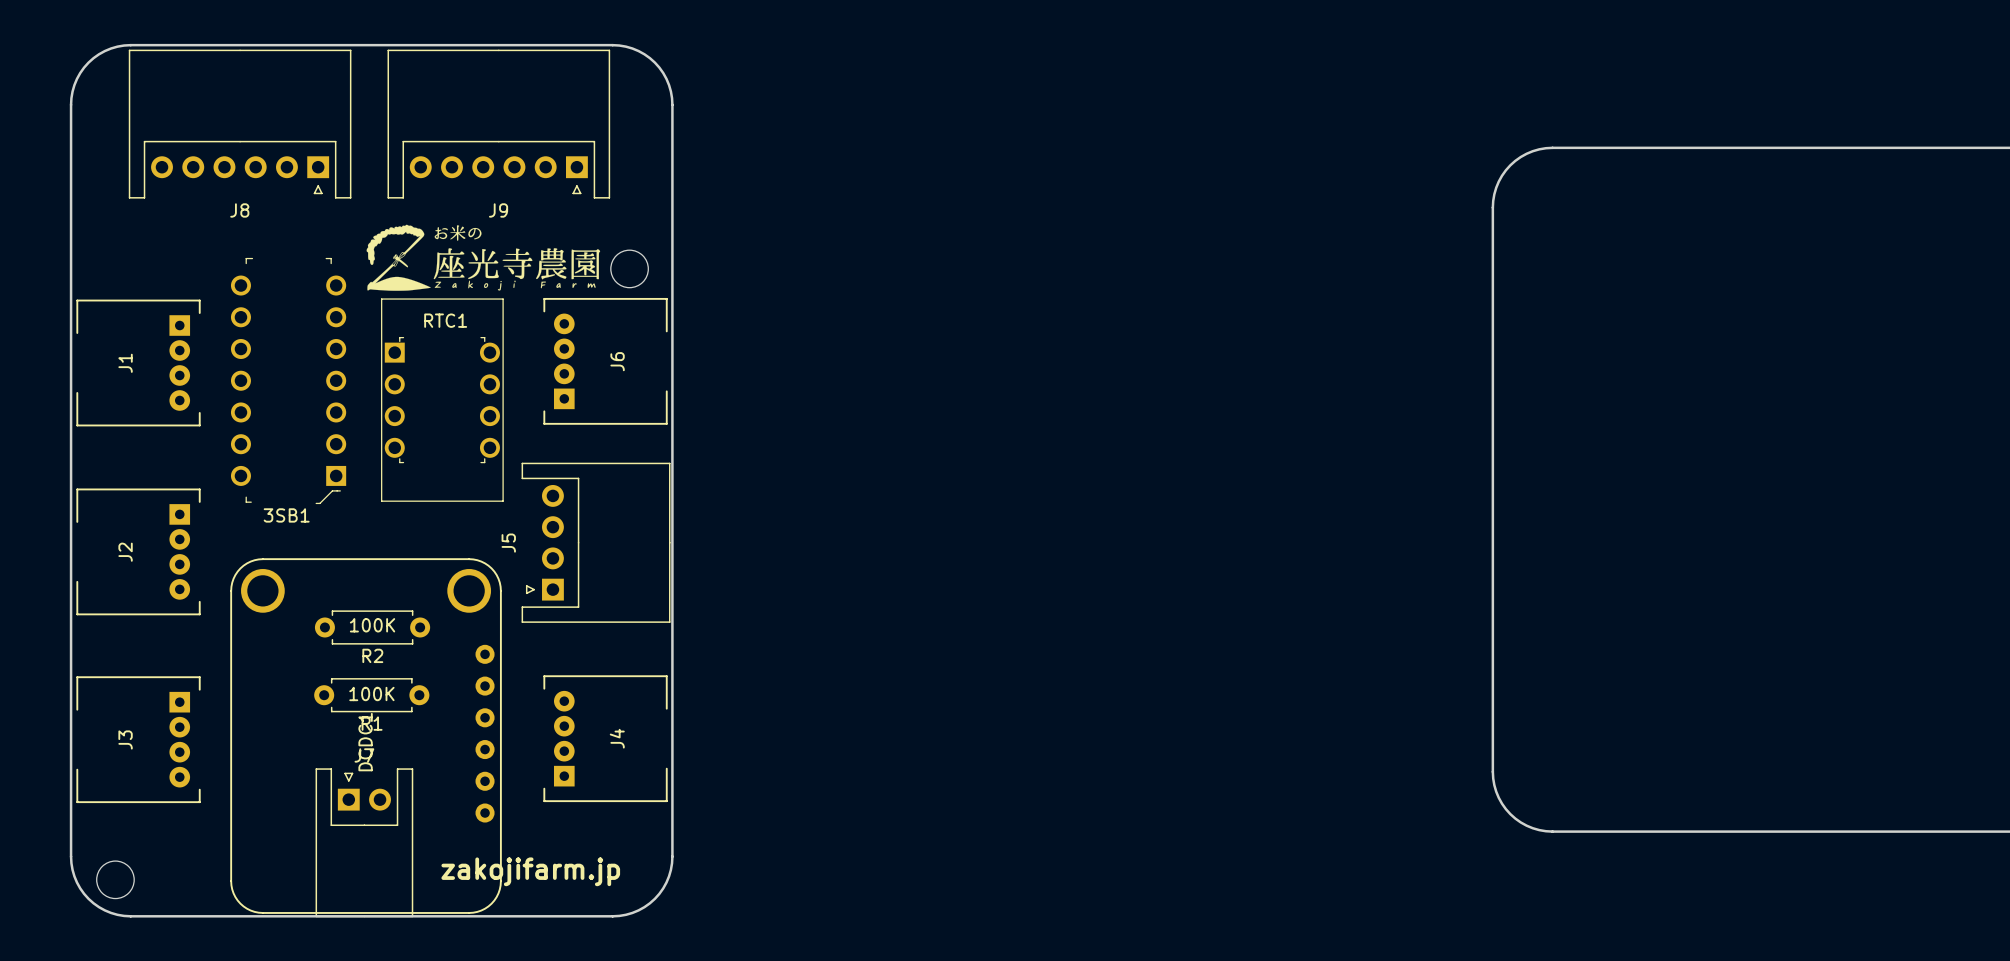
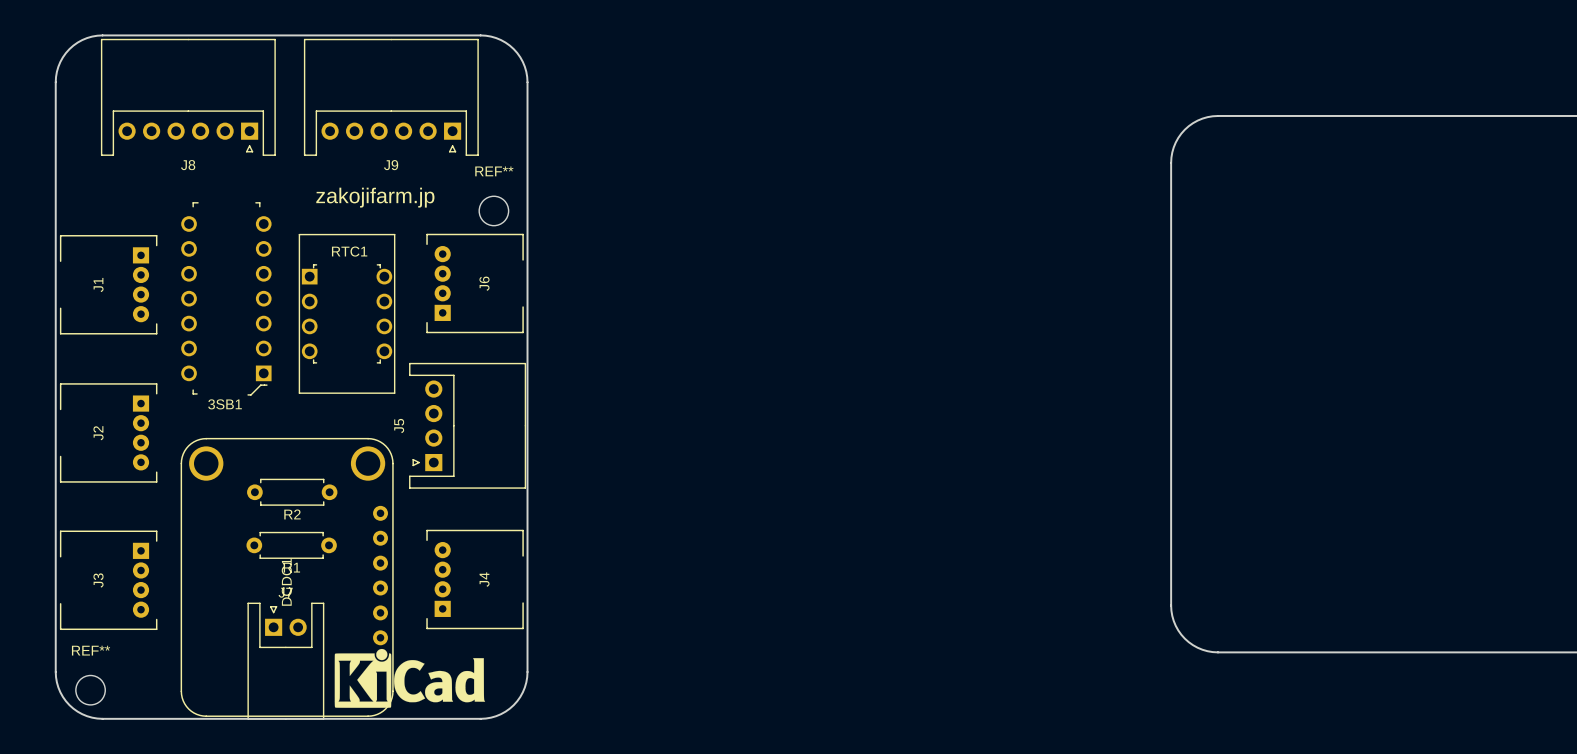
REF** name: none -> REF** (494, 171)
drawing: [366, 224, 601, 291] -> none
text: none -> zakojifarm.jp (375, 197)
R2 value: 100K (372, 625) -> none
R1 value: 100K (371, 693) -> none
drawing: none -> [334, 648, 486, 708]
REF** name: none -> REF** (91, 650)
text: zakojifarm.jp (530, 871) -> none

